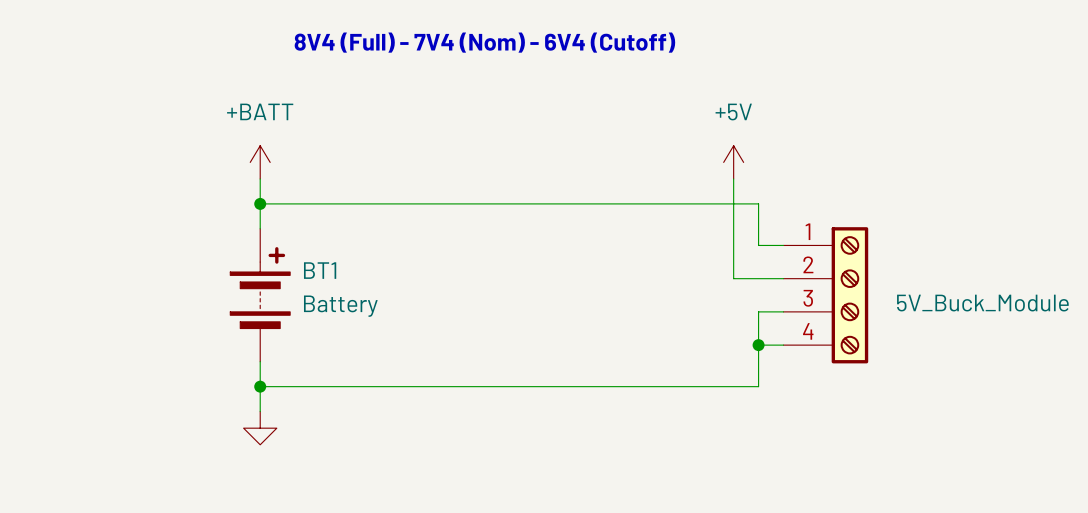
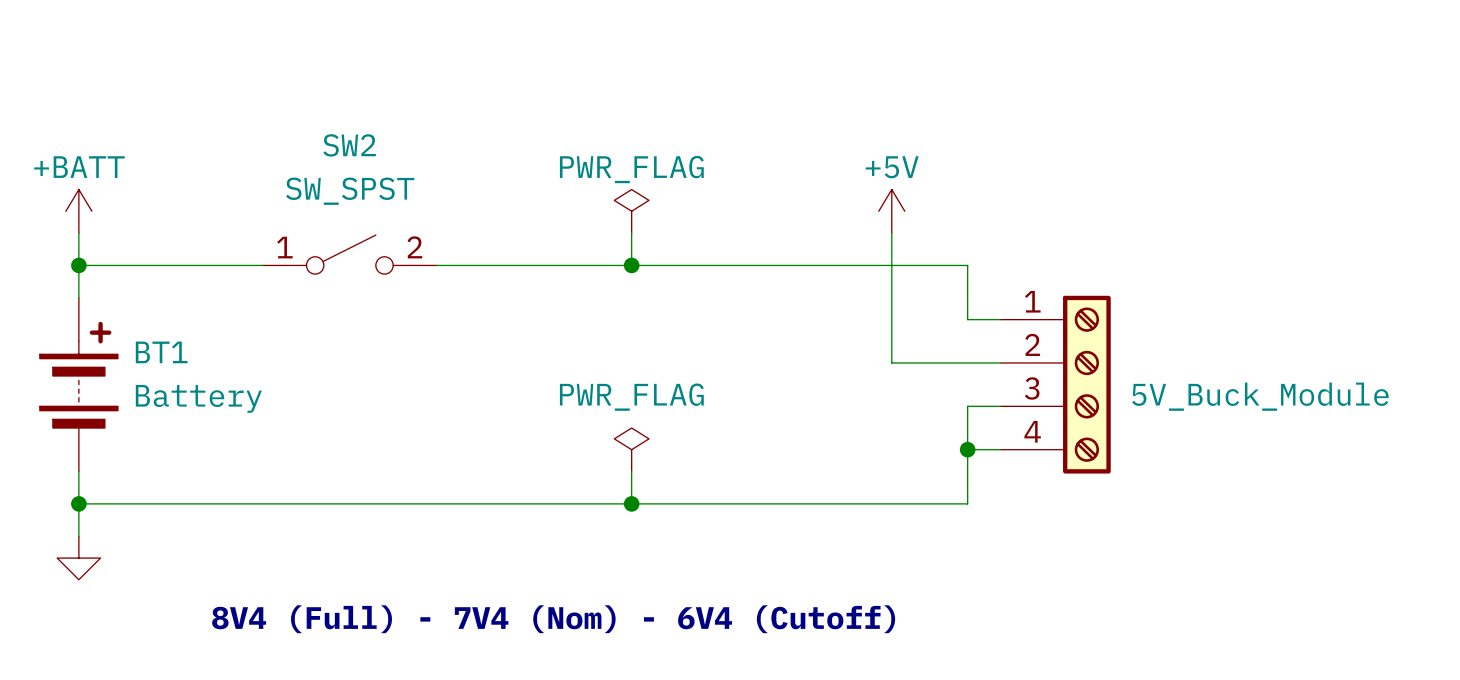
text: 8V4 (Full) - 7V4 (Nom) - 6V4 (Cutoff) (484, 42) -> none
power symbol text position: +BATT (260, 111) -> +BATT (79, 167)
power symbol text position: +5V (733, 112) -> +5V (892, 167)
power symbol position: +BATT (260, 162) -> +BATT (78, 211)
power symbol: none -> PWR_FLAG (631, 211)
power symbol position: +5V (733, 162) -> +5V (891, 211)
wire: (260, 179) (260, 228) -> (78, 232) (78, 297)
wire: none -> (631, 232) (631, 265)
wire: (733, 179) (733, 278) -> (891, 232) (891, 362) (935, 362)
SW2: none -> SW_SPST (349, 254)
wire: none -> (78, 265) (263, 265)
junction: none -> (78, 265)
wire: (260, 203) (351, 203) -> none
junction: (260, 203) -> none
junction: none -> (631, 265)
BT1 position: (260, 295) -> (78, 384)
power symbol: none -> PWR_FLAG (631, 449)
wire: (260, 361) (260, 411) -> (78, 471) (78, 536)
wire: none -> (631, 471) (631, 503)
wire: none -> (78, 503) (317, 503)
junction: none -> (78, 503)
junction: (260, 386) -> none
junction: none -> (631, 503)
power symbol position: (260, 428) -> (78, 558)
text: none -> 8V4 (Full) - 7V4 (Nom) - 6V4 (Cutoff) (553, 619)

